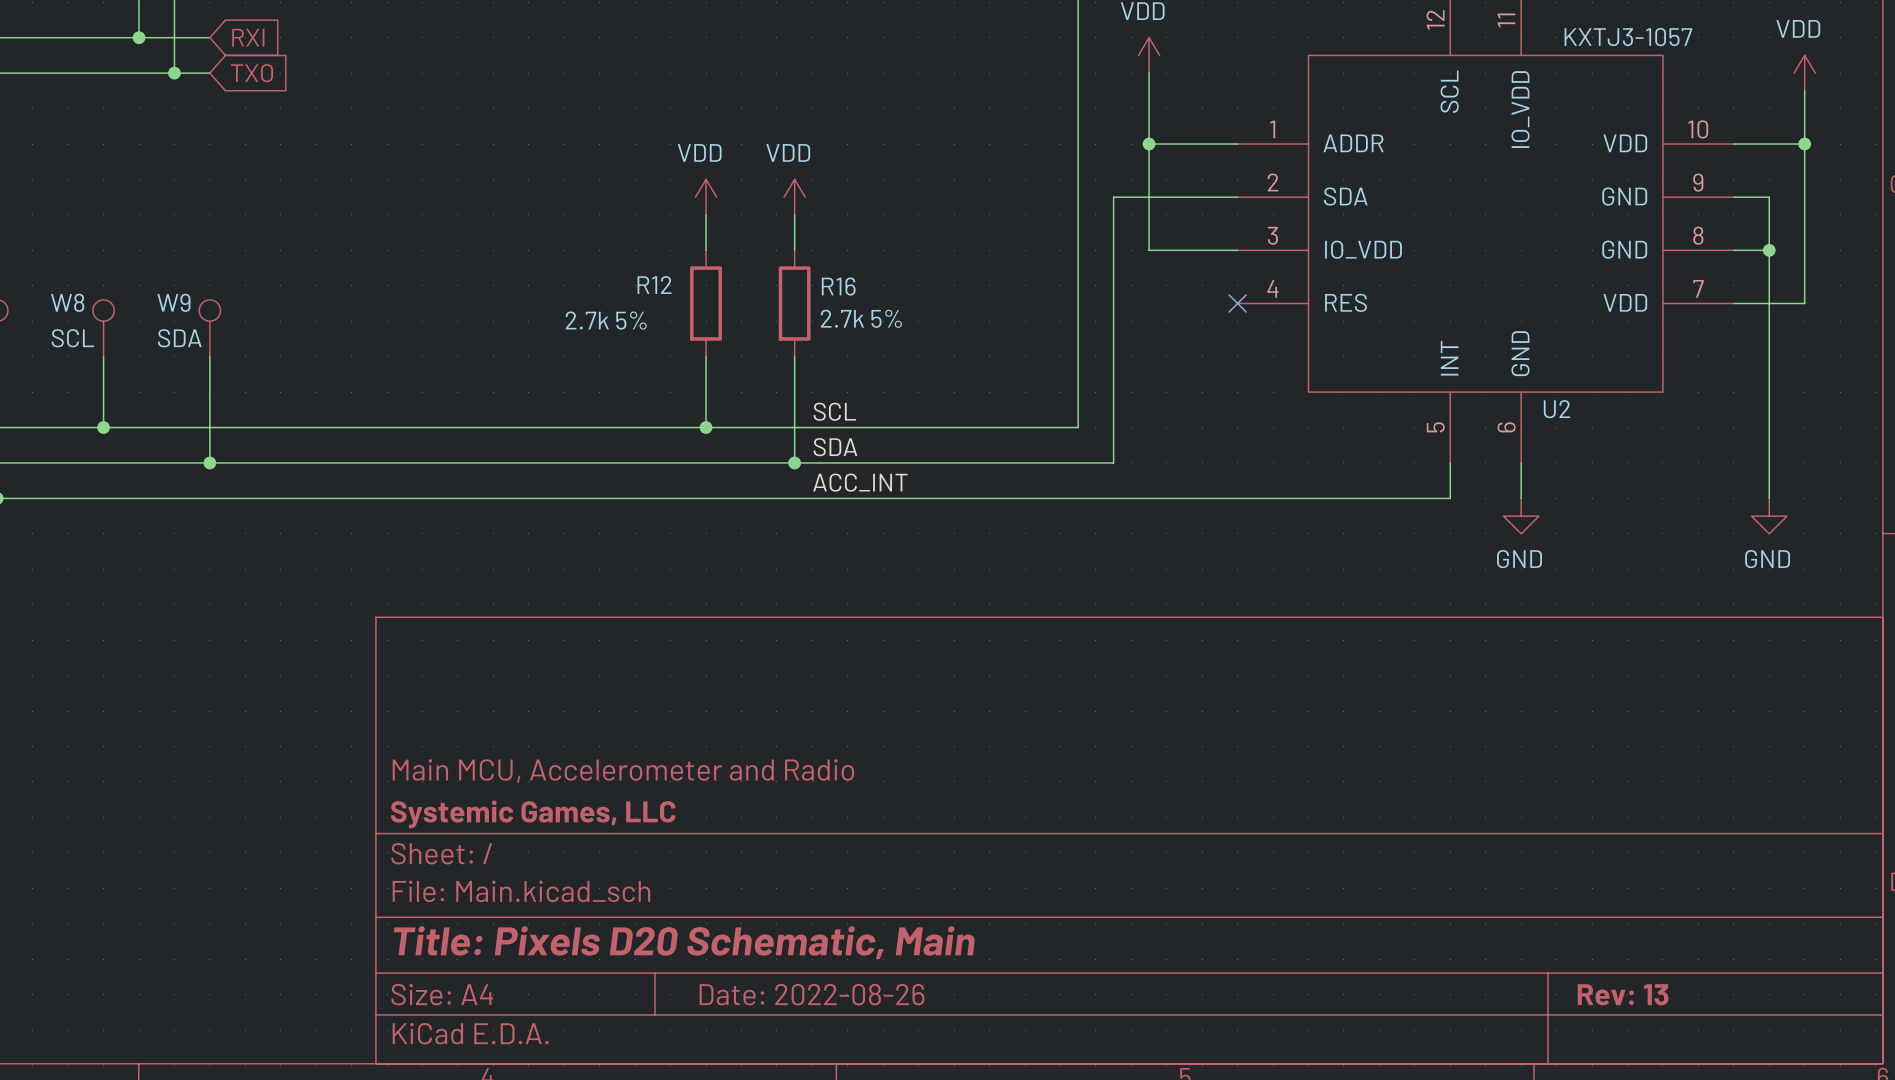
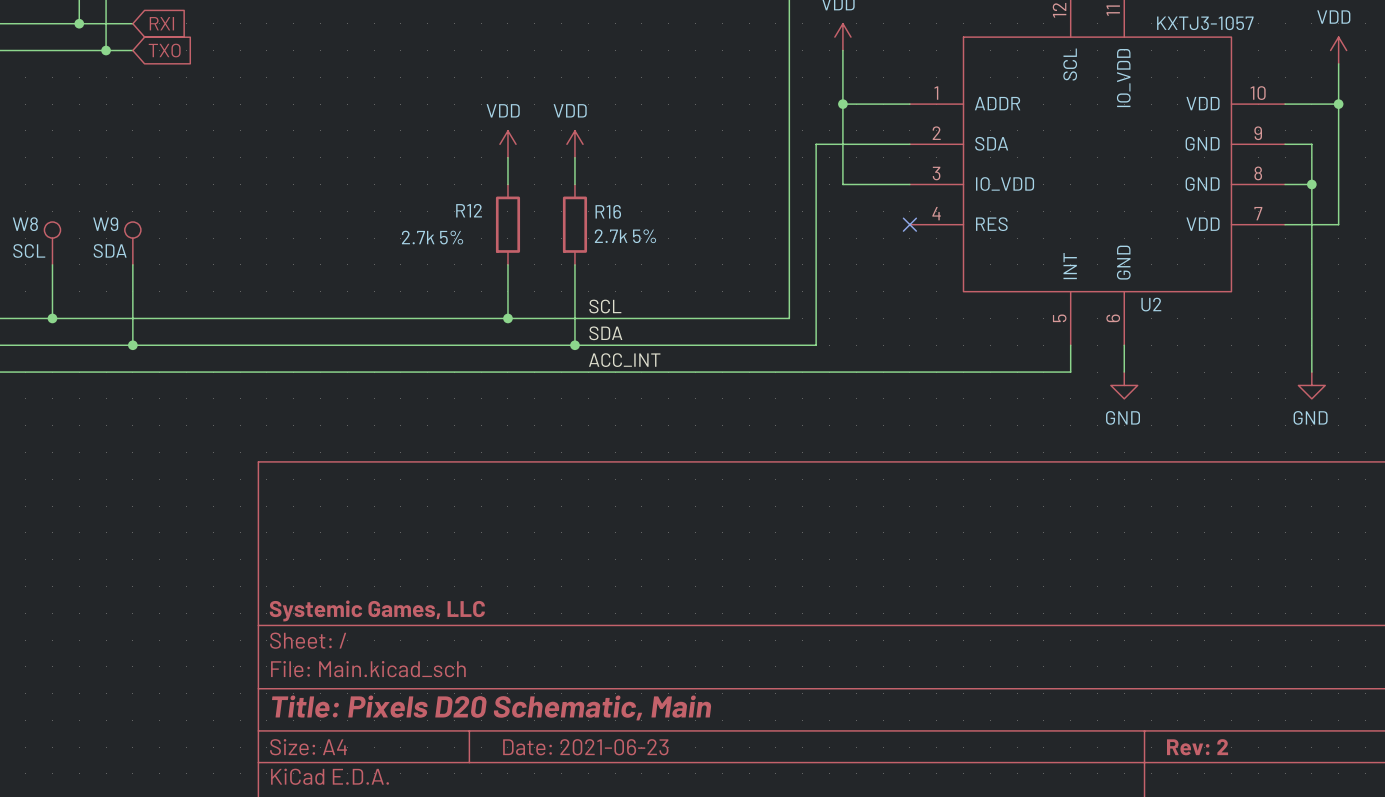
title block: Main MCU, Accelerometer and Radio (623, 771) -> none
title block: Date: 2022-08-26 (812, 994) -> Date: 2021-06-23 (585, 747)
title block: Rev: 13 (1623, 994) -> Rev: 2 (1197, 747)

